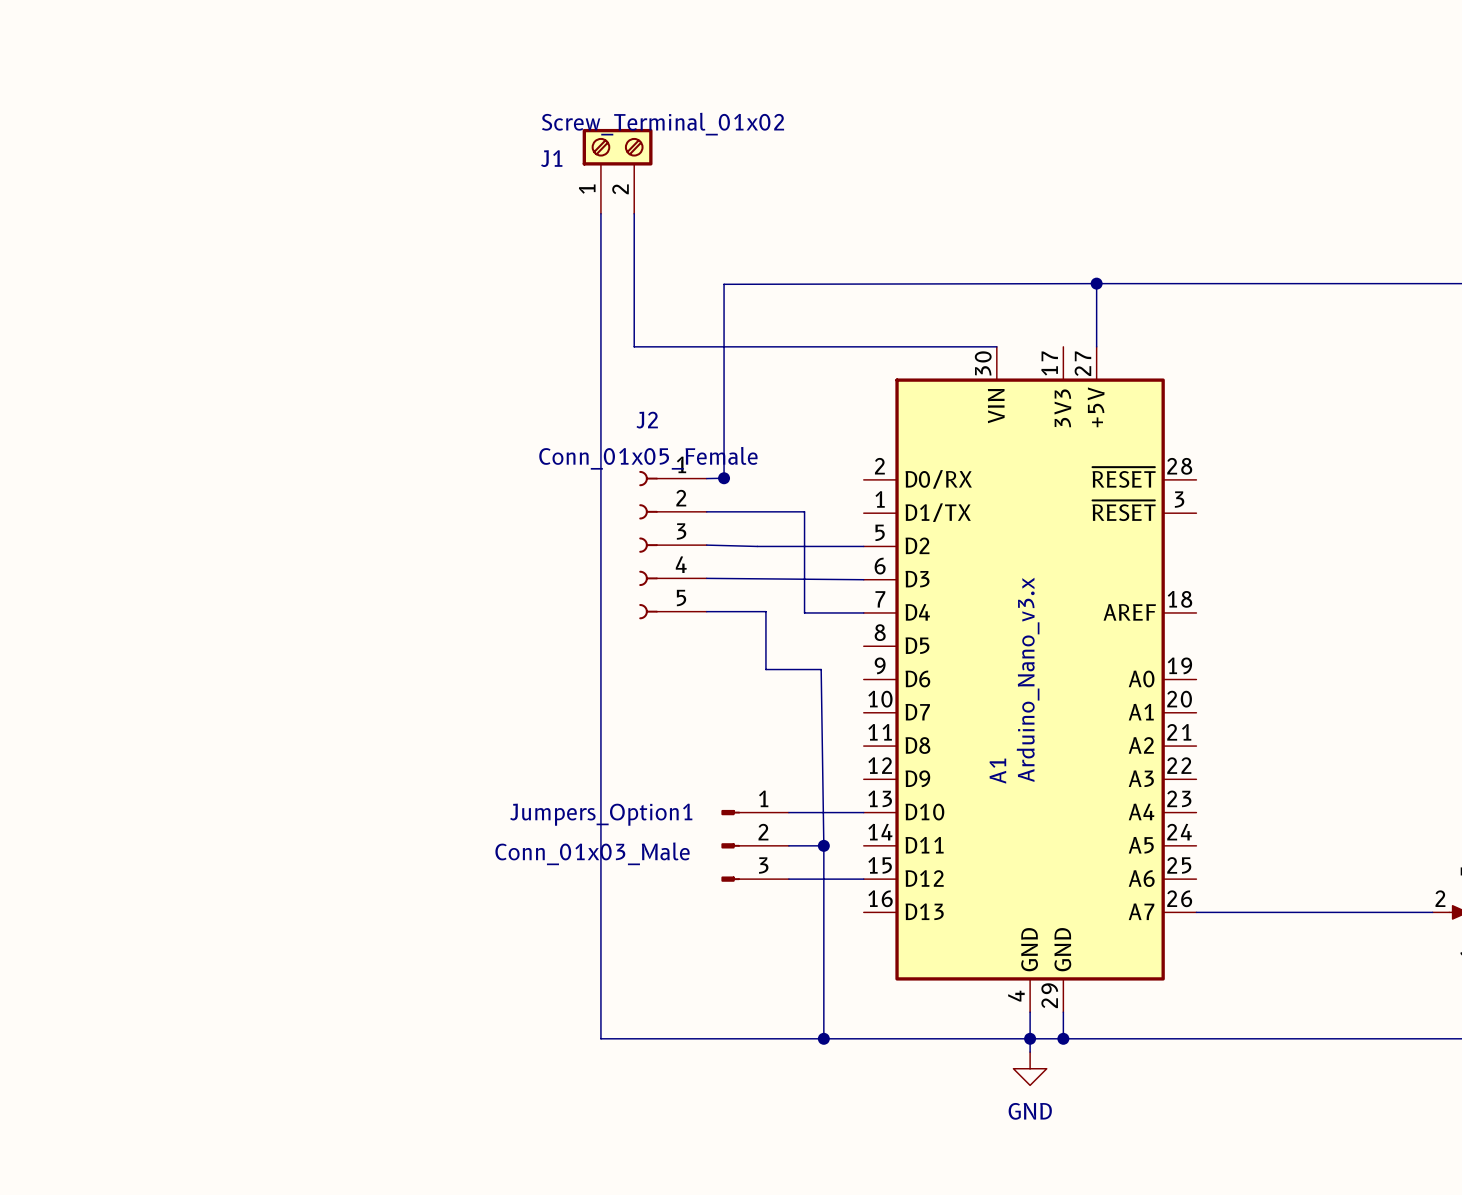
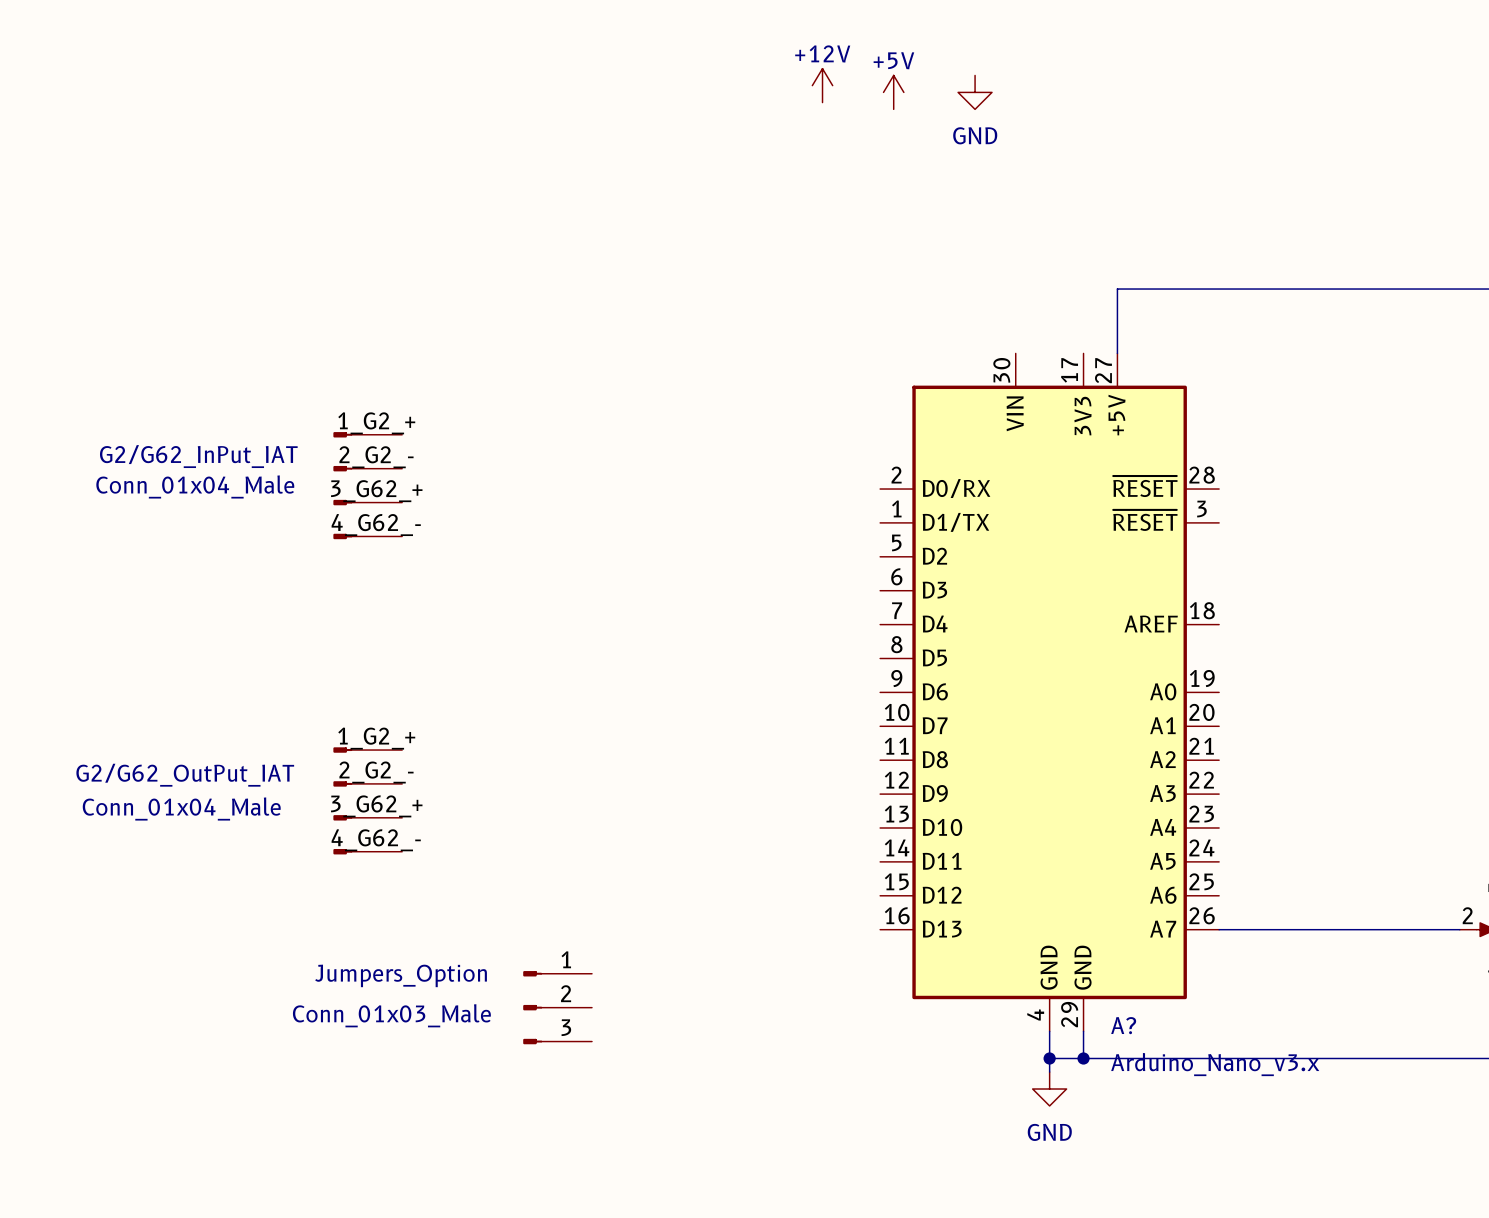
power symbol: none -> +12V (822, 85)
power symbol: none -> +5V (893, 92)
power symbol: none -> GND (975, 92)
J1: Screw_Terminal_01x02 (617, 171) -> none
wire: (600, 213) (600, 1038) (1030, 1038) -> none
wire: (634, 213) (634, 346) (996, 346) -> none
wire: (1096, 283) (724, 284) (724, 478) -> none
junction: (1096, 283) -> none
G2/G62_InPut_IAT: none -> Conn_01x04_Male (367, 485)
wire: (724, 478) (706, 478) -> none
junction: (724, 478) -> none
wire: (706, 511) (804, 511) (804, 612) (863, 612) -> none
J2: Conn_01x05_Female (672, 545) -> none
wire: (706, 545) (863, 546) -> none
wire: (706, 578) (863, 579) -> none
wire: (706, 611) (765, 611) (765, 669) (821, 669) (823, 845) -> none
A1 value rotation: 0° (1028, 679) -> 90° clockwise (1215, 1064)
A1 value position: Arduino_Nano_v3.x (1028, 679) -> Arduino_Nano_v3.x (1215, 1064)
A1 name: A1 (997, 771) -> A? (1123, 1025)
G2/G62_OutPut_IAT: none -> Conn_01x04_Male (367, 800)
wire: (788, 812) (863, 812) -> none
Jumpers_Option1: Conn_01x03_Male (755, 845) -> none
wire: (788, 845) (823, 845) -> none
wire: (823, 845) (823, 1038) -> none
junction: (823, 845) -> none
wire: (788, 879) (863, 879) -> none
Jumpers_Option: none -> Conn_01x03_Male (557, 1007)
junction: (823, 1038) -> none

